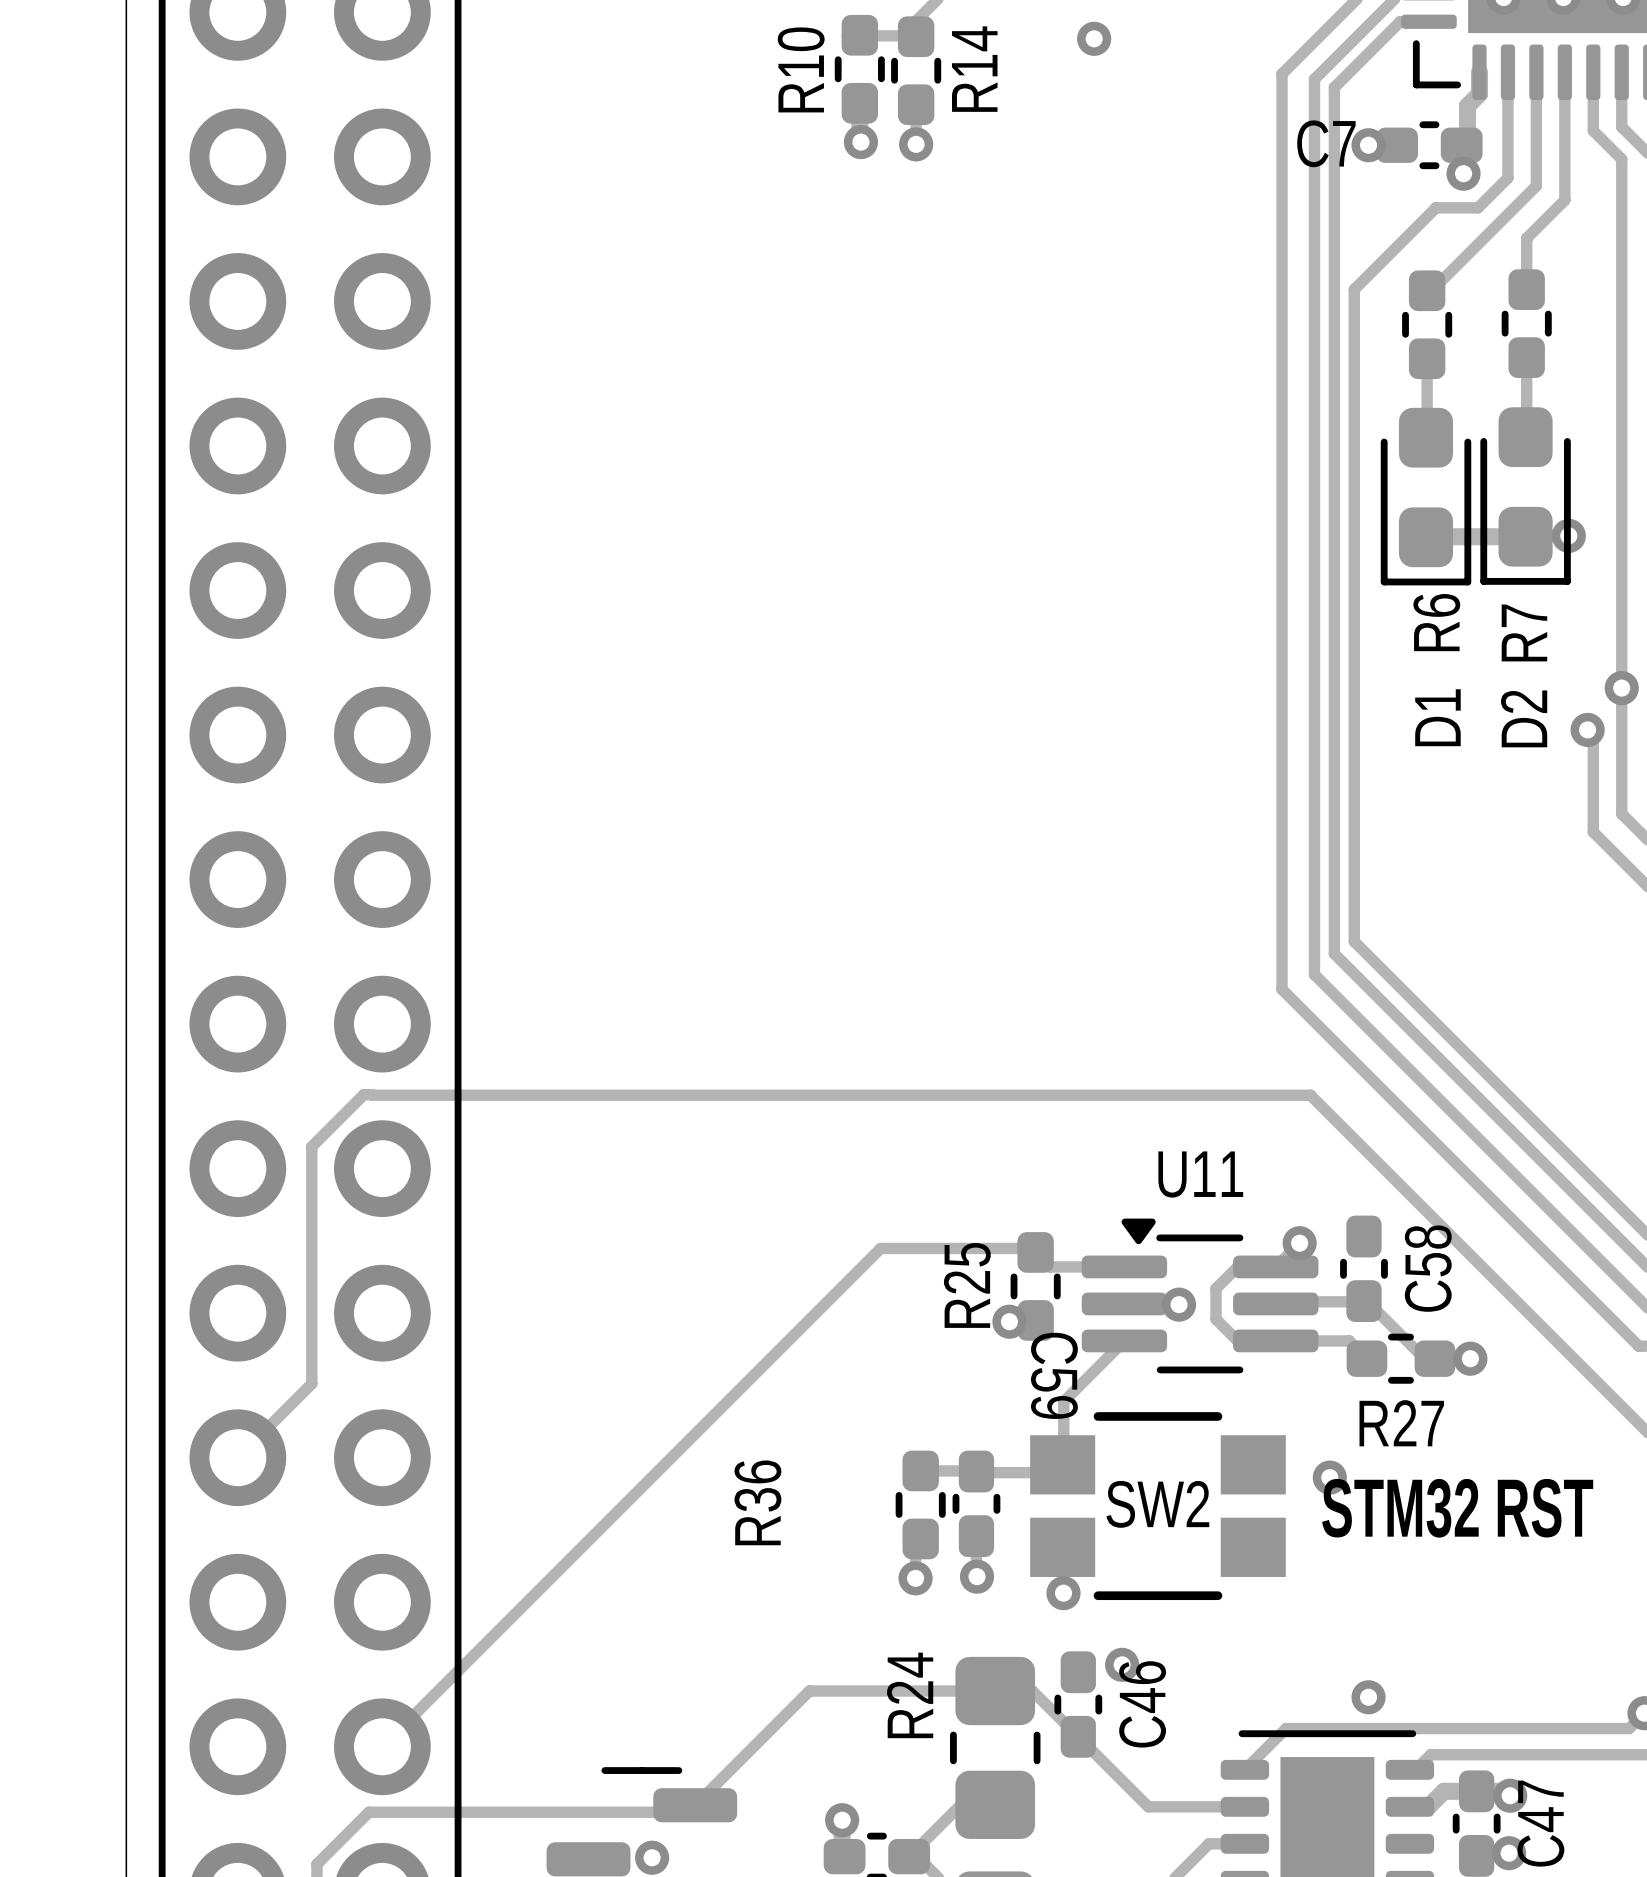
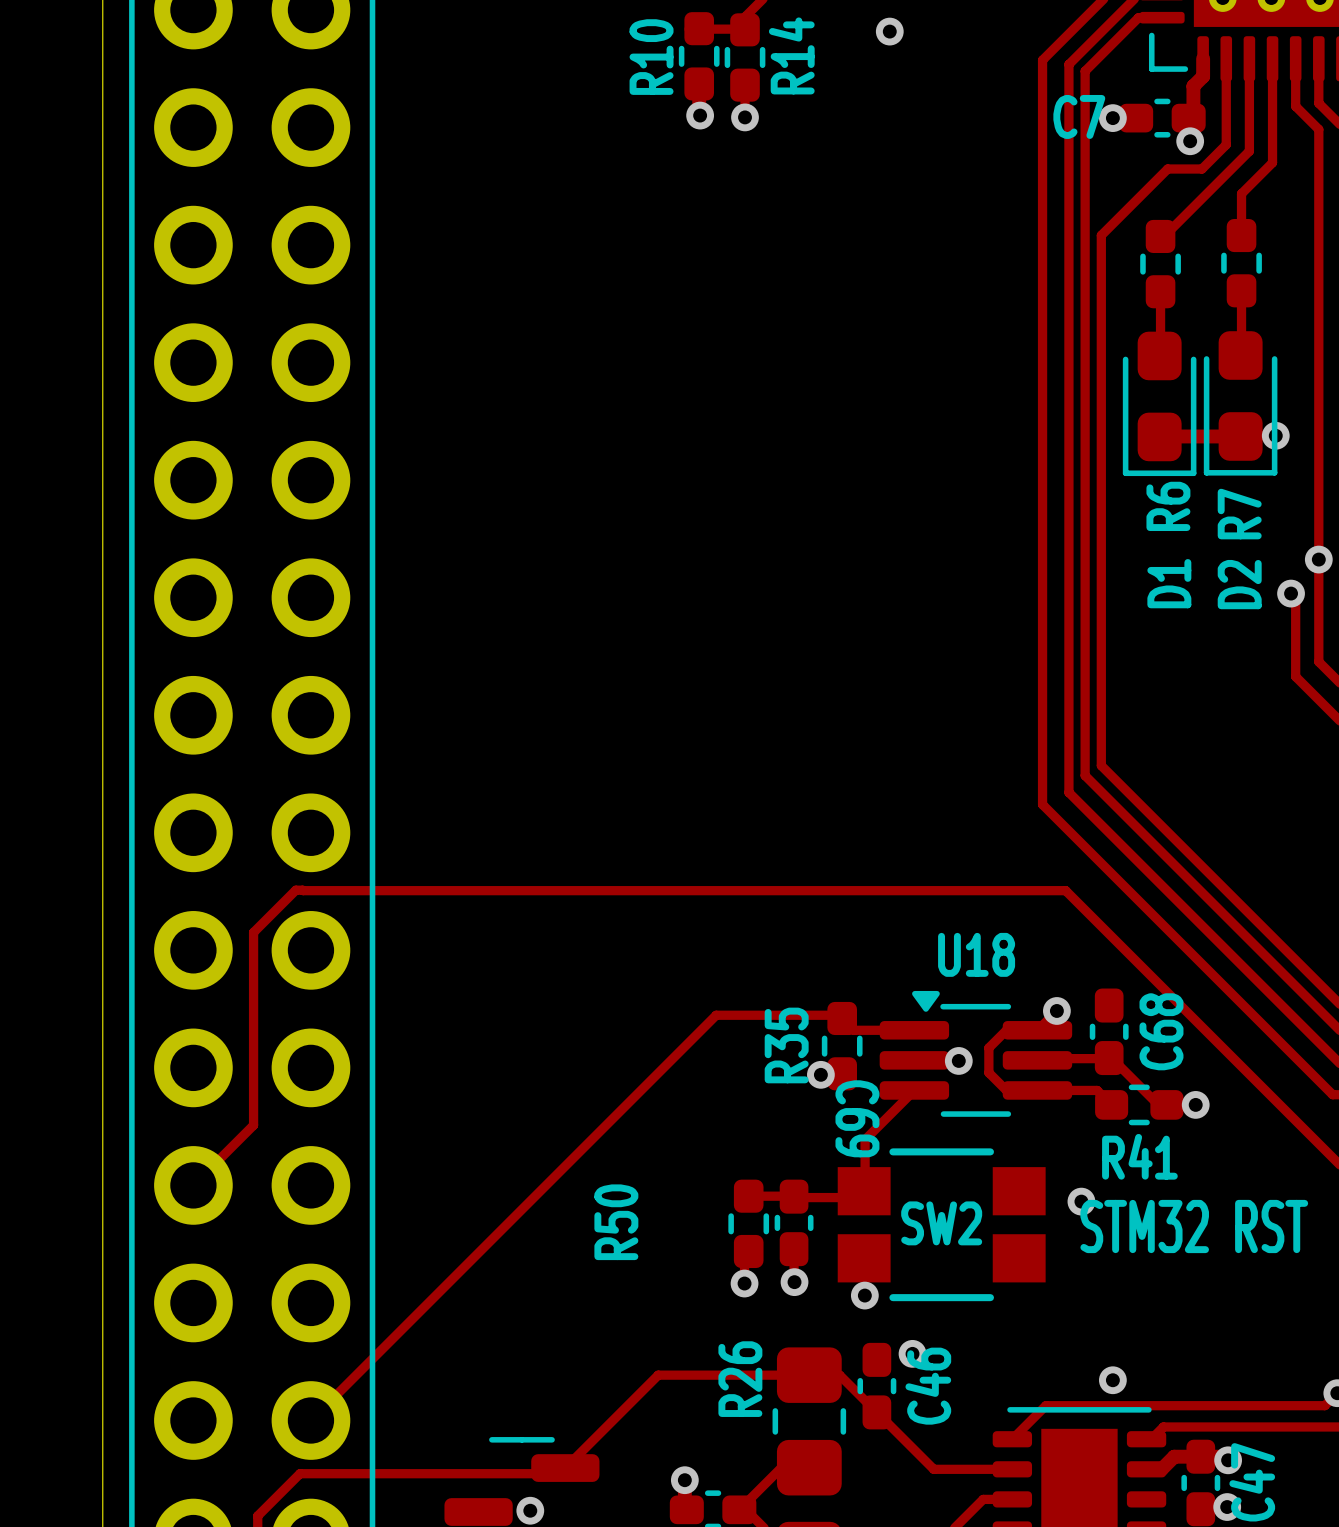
U11 name: U11 (1200, 1174) -> U18 (976, 954)
C58 name: C58 (1428, 1268) -> C68 (1161, 1031)
R25 name: R25 (967, 1285) -> R35 (786, 1045)
C59 name: C59 (1054, 1375) -> C69 (857, 1118)
R27 name: R27 (1401, 1423) -> R41 (1139, 1156)
R36 name: R36 (757, 1502) -> R50 (616, 1222)
R24 name: R24 (910, 1695) -> R26 (740, 1379)

